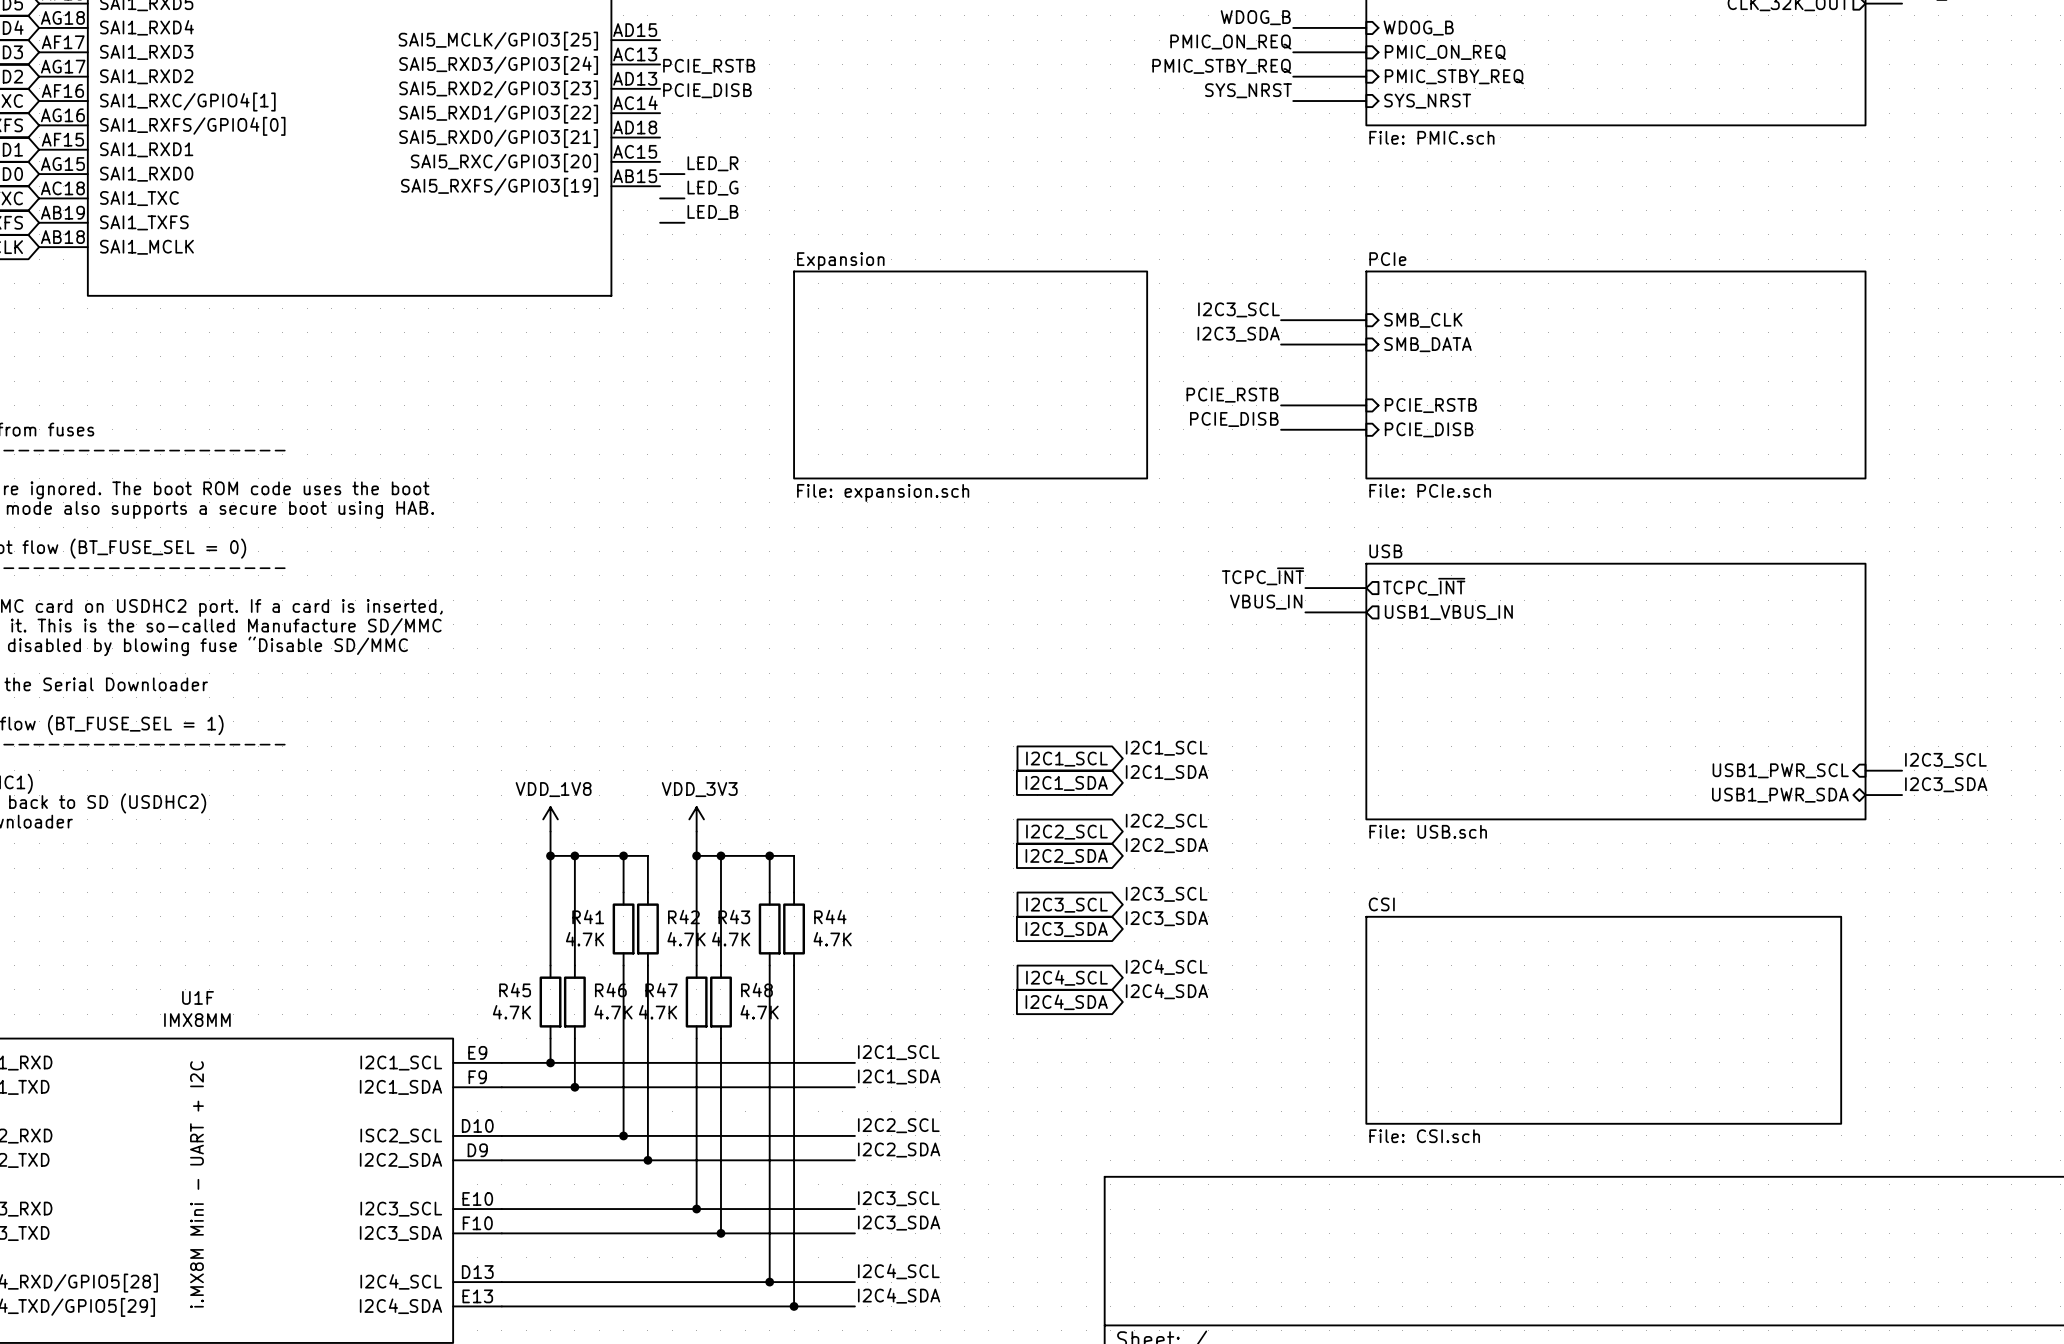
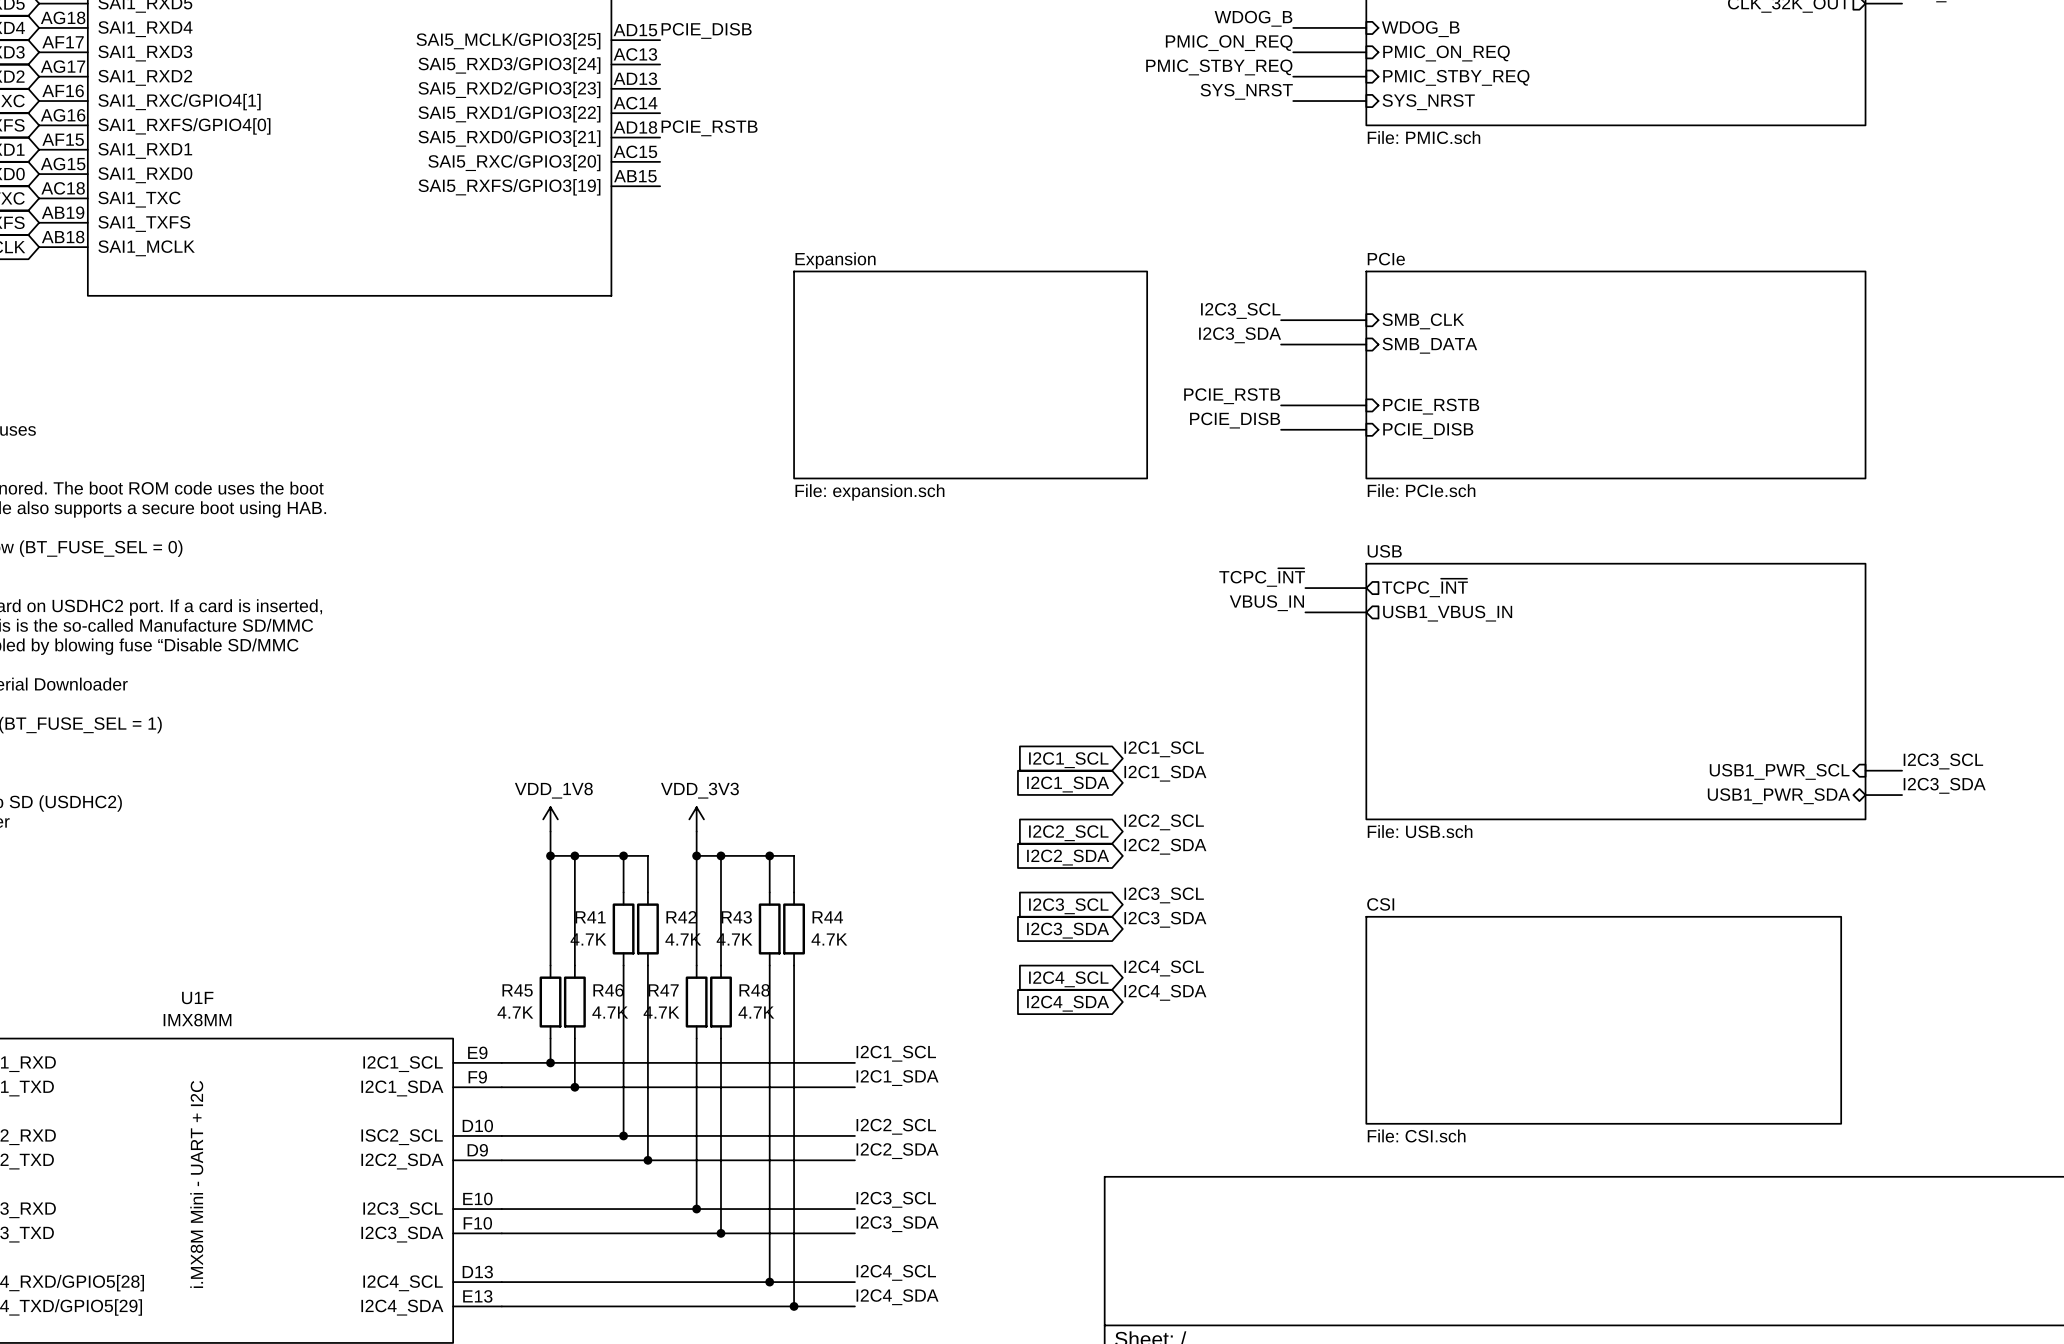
label position: PCIE_RSTB (709, 66) -> PCIE_RSTB (709, 128)
label position: PCIE_DISB (707, 90) -> PCIE_DISB (706, 30)
label: LED_R (712, 163) -> none
wire: (660, 174) (684, 174) -> none
label: LED_G (712, 188) -> none
wire: (660, 198) (684, 198) -> none
label: LED_B (712, 212) -> none
wire: (660, 222) (684, 222) -> none

